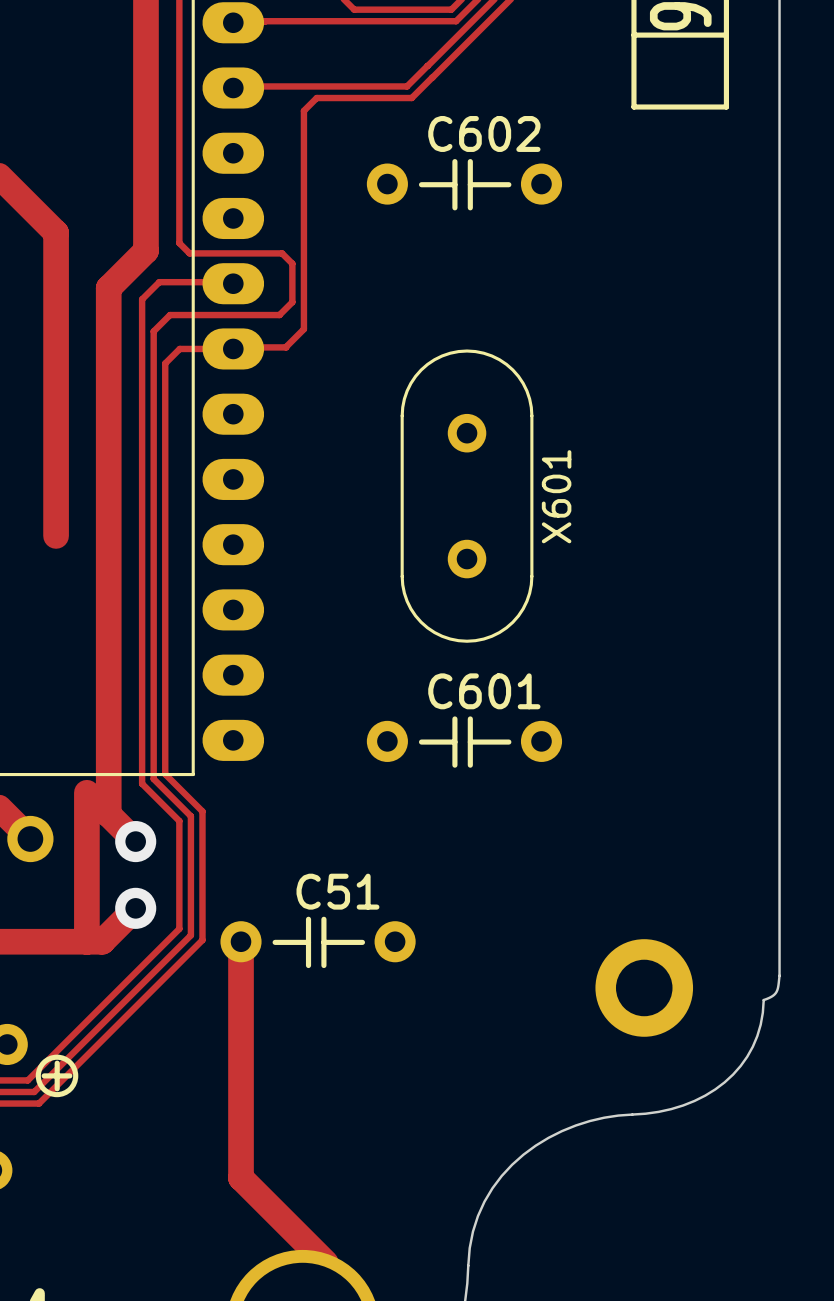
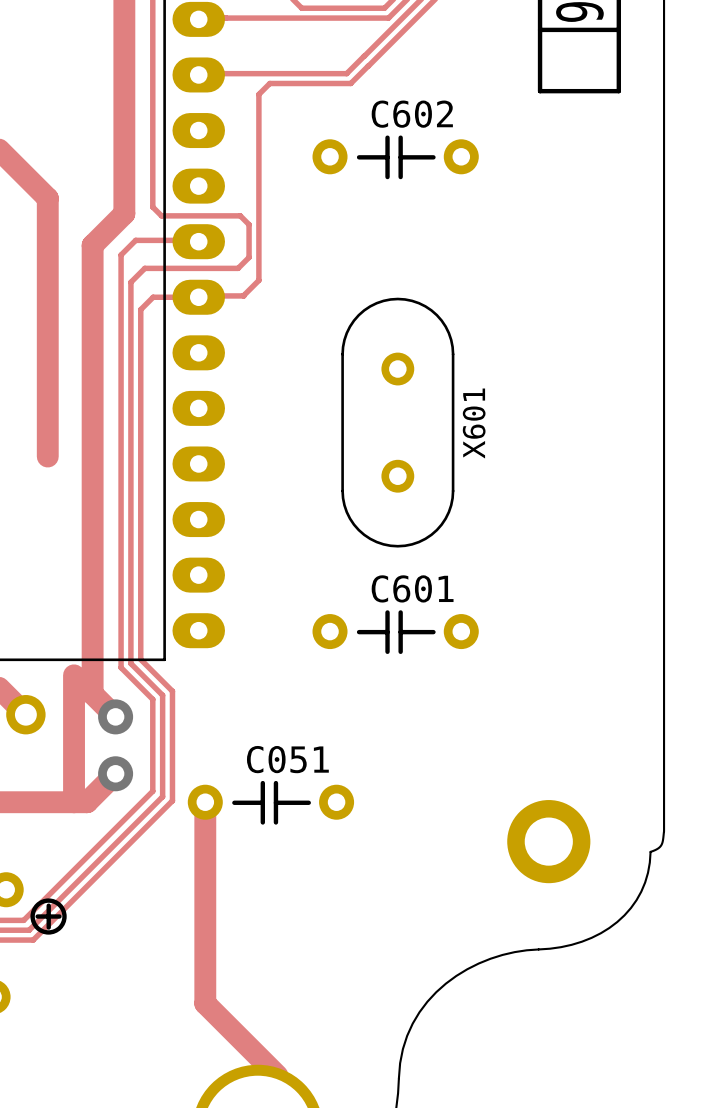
C51 name: C51 (337, 891) -> C051 (287, 759)

